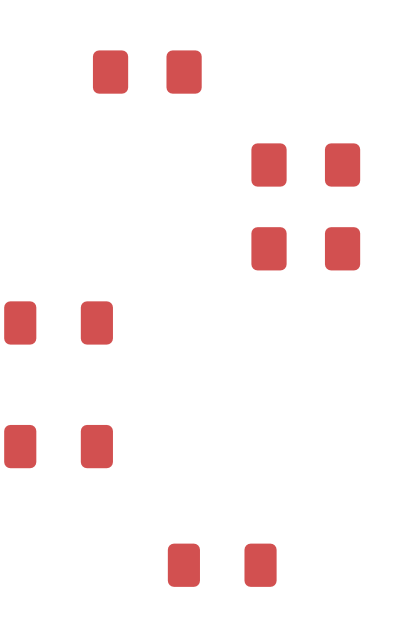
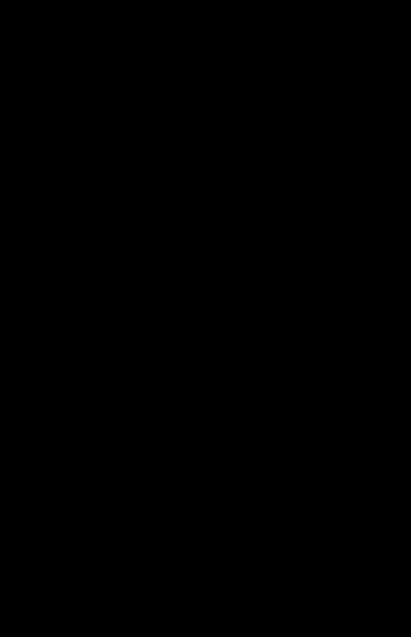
part: (147, 72) -> none
part: (305, 164) -> none
part: (305, 248) -> none
part: (58, 322) -> none
part: (58, 446) -> none
part: (222, 565) -> none

